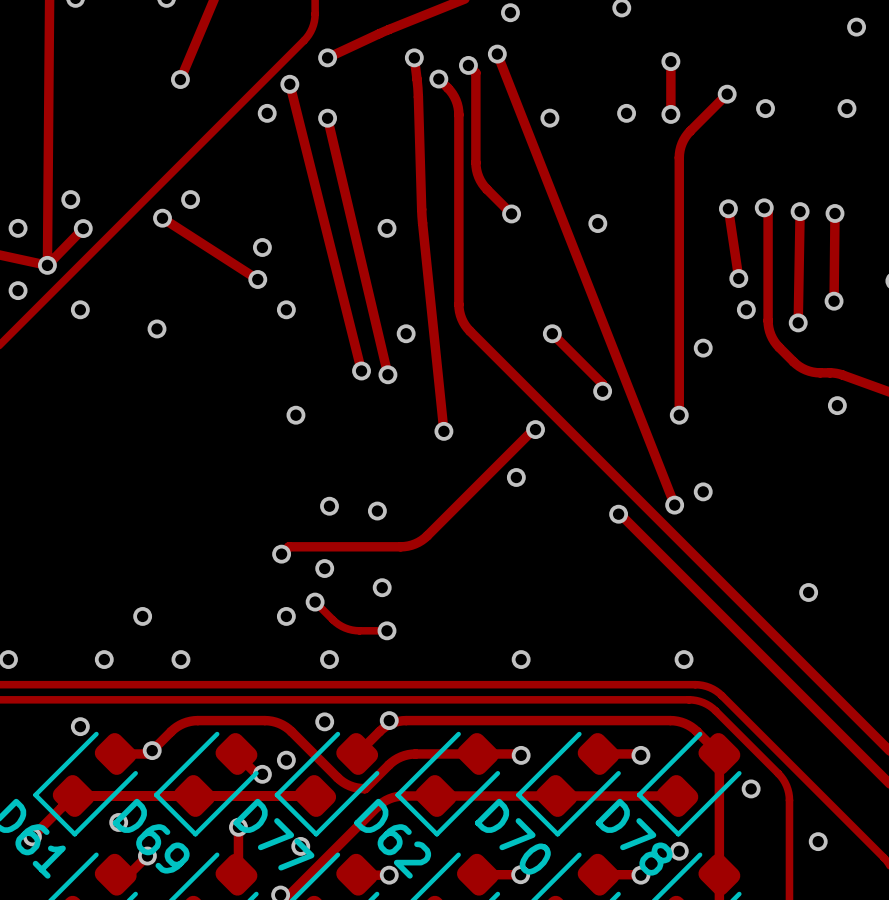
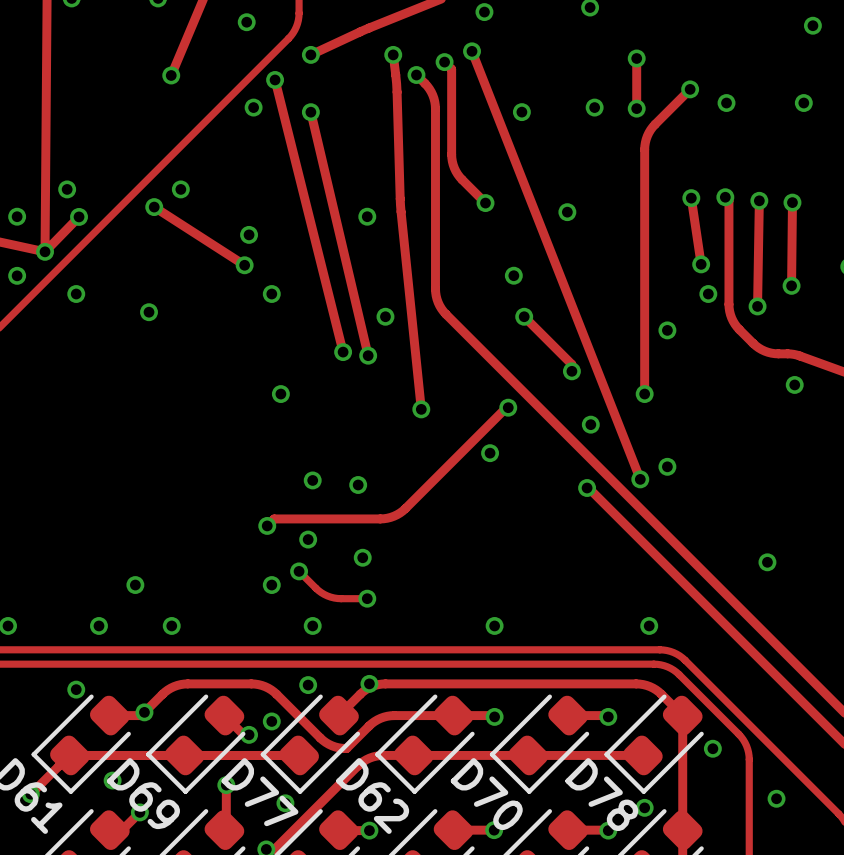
via: none -> (246, 22)
via: none -> (513, 275)
via: none -> (590, 424)

